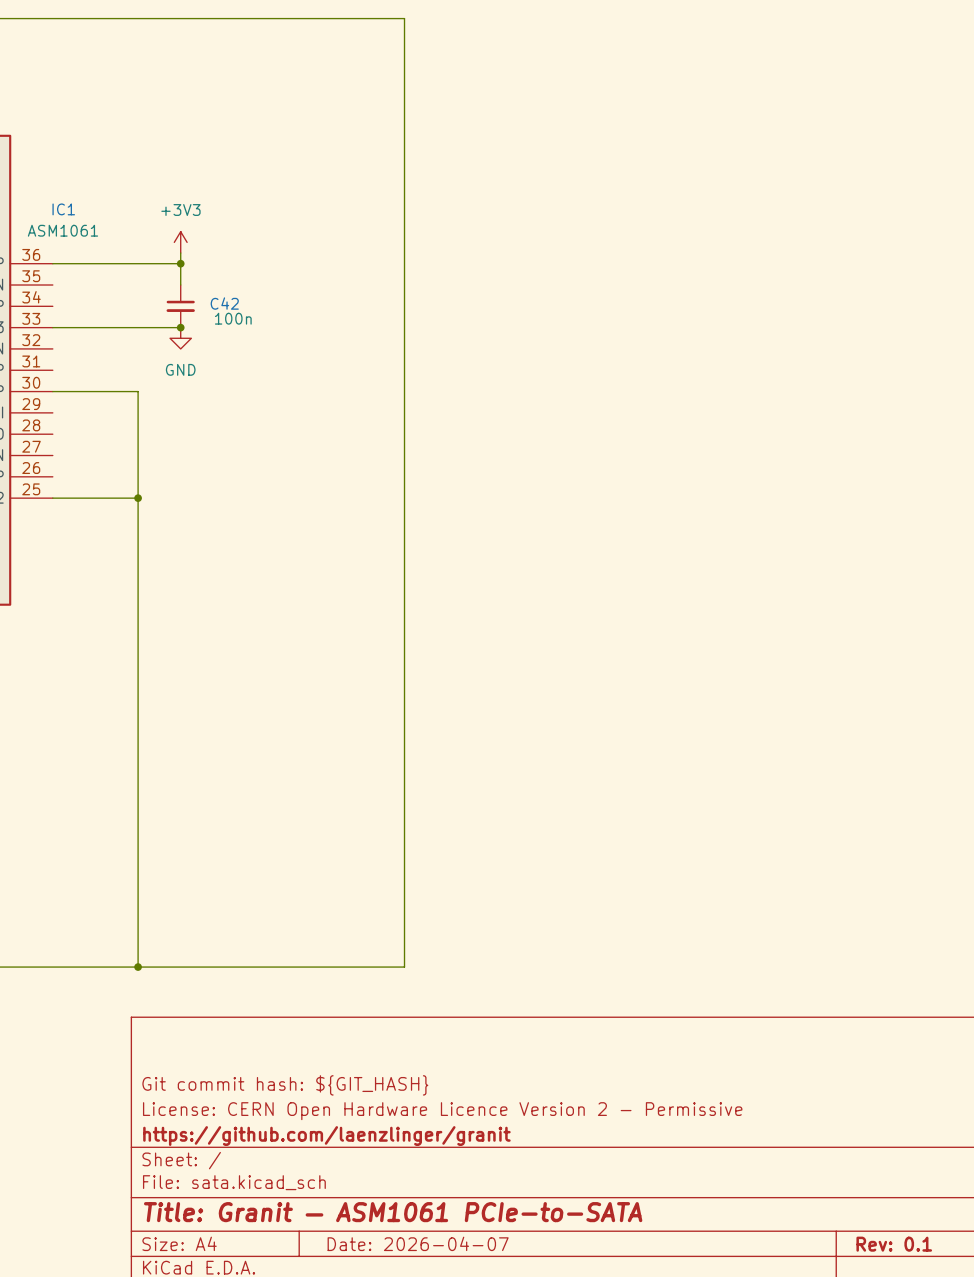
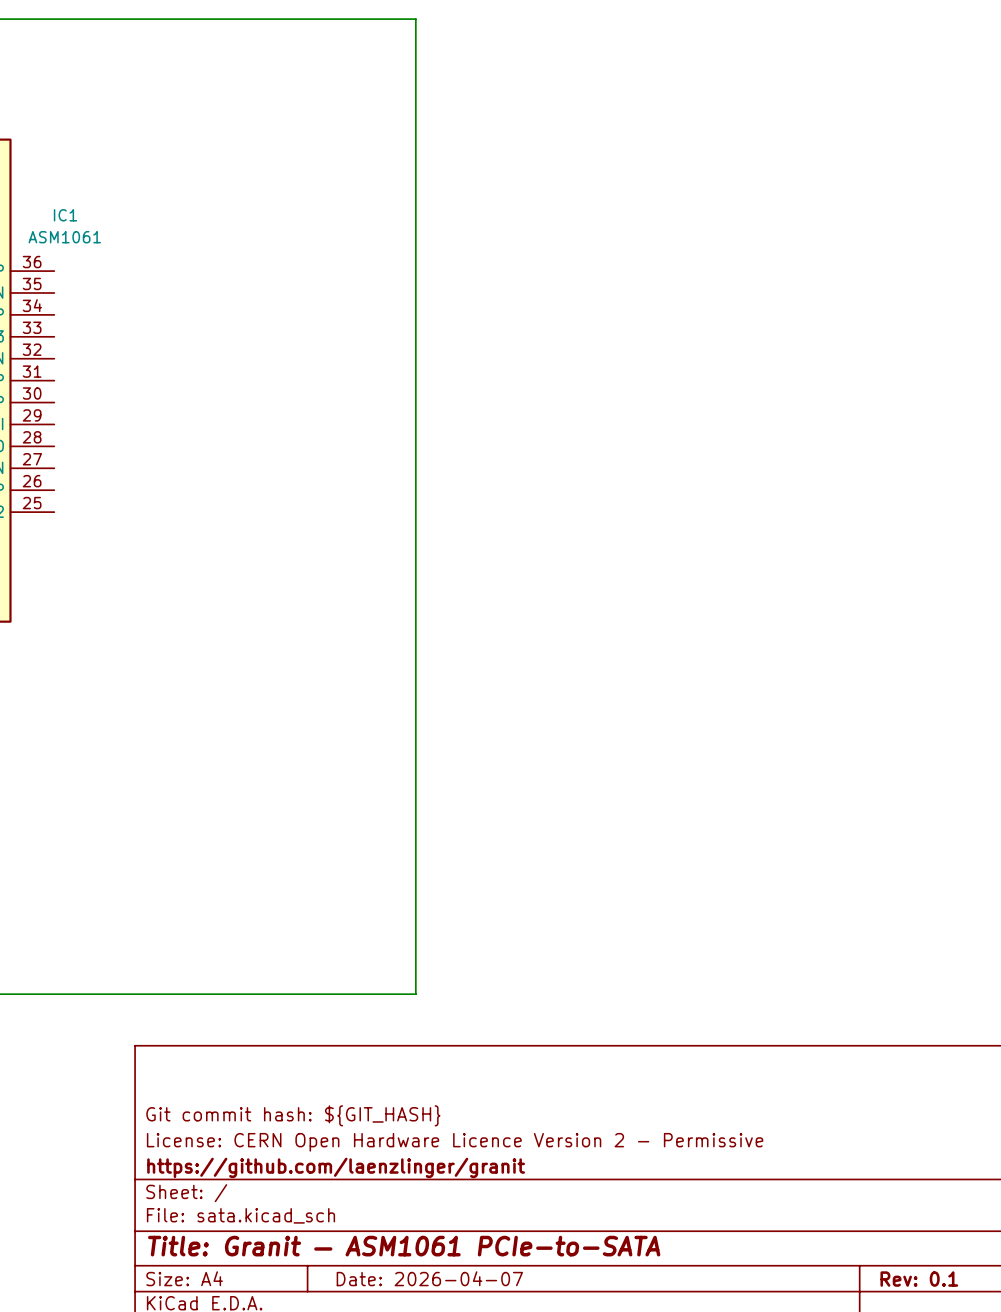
power symbol: +3V3 (180, 242) -> none
wire: (180, 253) (180, 285) -> none
wire: (52, 263) (180, 263) -> none
junction: (180, 263) -> none
C42: 100n (180, 306) -> none
wire: (52, 327) (180, 327) -> none
junction: (180, 327) -> none
power symbol: GND (180, 338) -> none
wire: (52, 391) (138, 391) (138, 967) -> none
wire: (52, 498) (138, 498) -> none
junction: (138, 498) -> none
junction: (138, 967) -> none

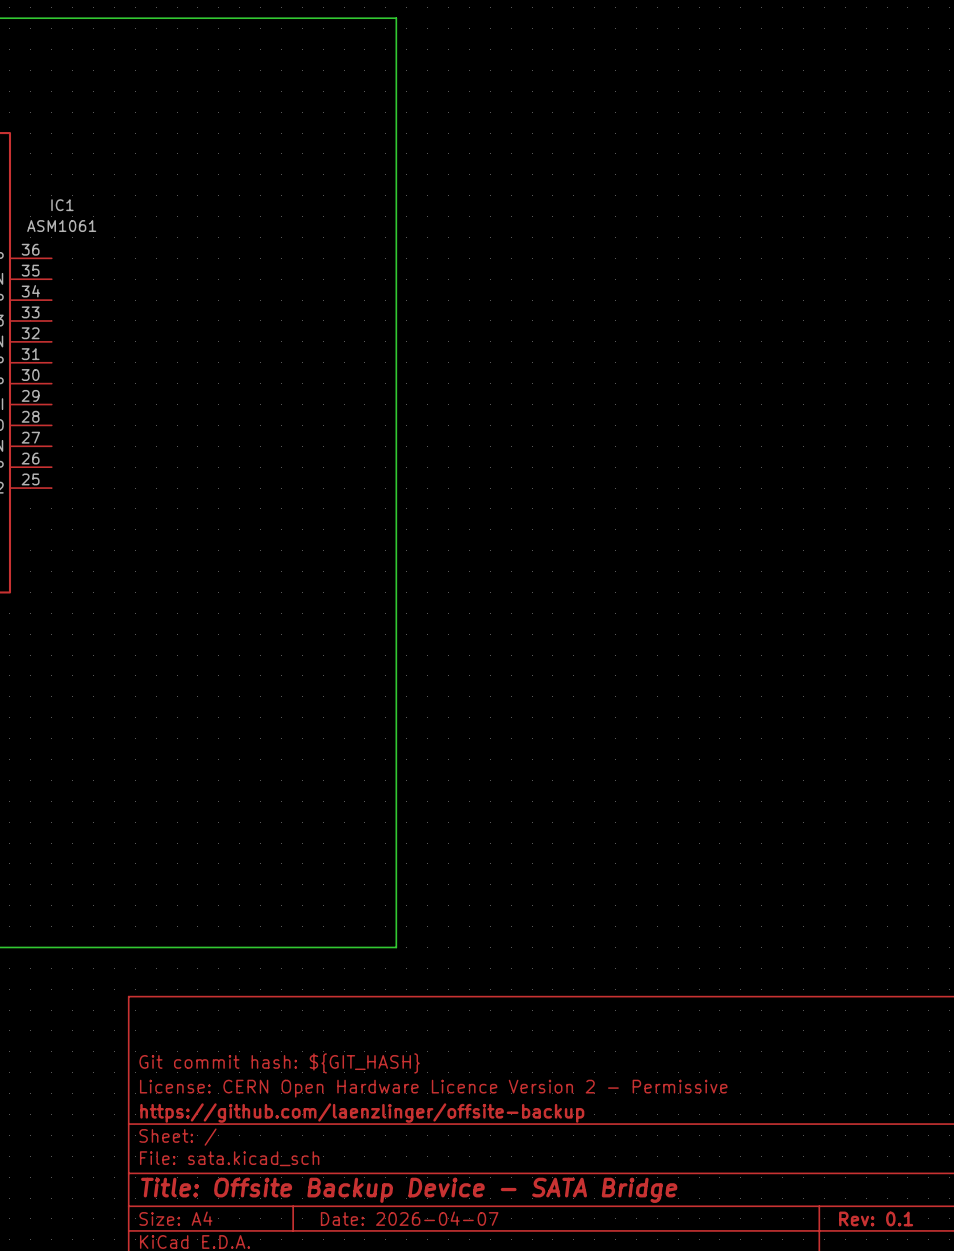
title block: https://github.com/laenzlinger/granit (336, 1167) -> https://github.com/laenzlinger/offsite-backup (362, 1113)
title block: Title: Granit — ASM1061 PCIe-to-SATA (404, 1246) -> Title: Offsite Backup Device - SATA Bridge (409, 1190)

